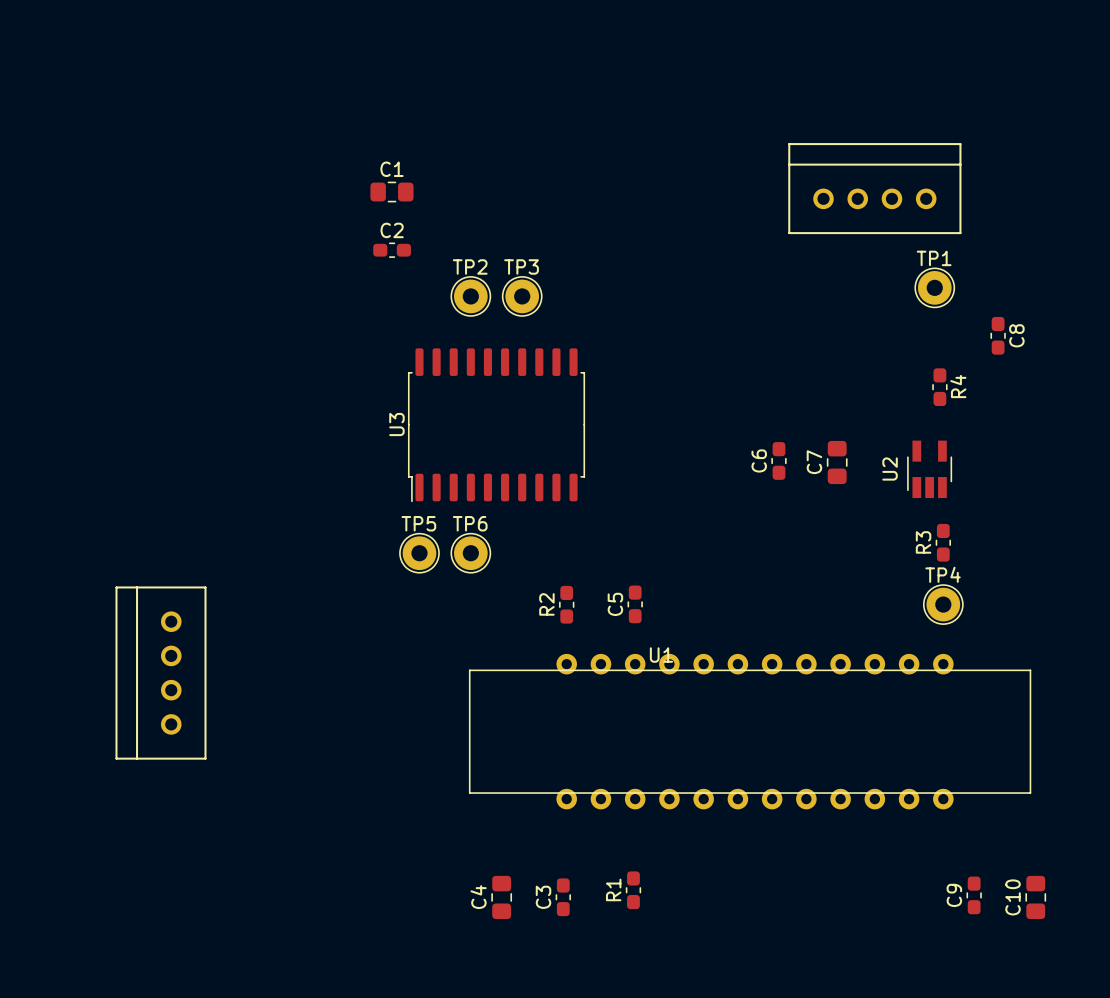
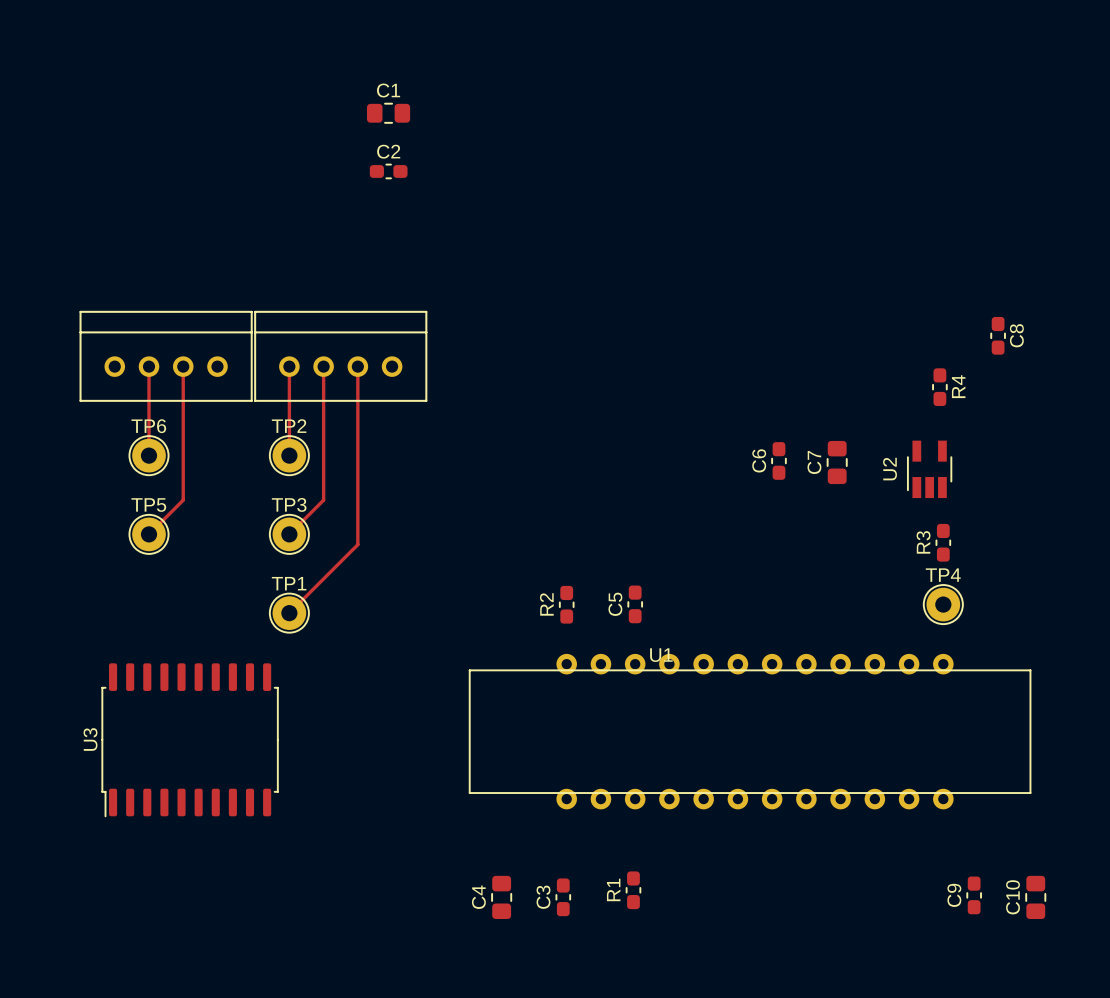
part: (874, 188) -> none
C1 position: (391, 192) -> (388, 113)
C2 position: (392, 250) -> (388, 171)
TP1 position: (934, 287) -> (289, 613)
TP2 position: (470, 296) -> (289, 455)
TP3 position: (522, 296) -> (289, 534)
part: none -> (166, 356)
part: none -> (340, 356)
top track: none -> (149, 366) (149, 455)
top track: none -> (183, 366) (183, 500) (149, 534)
top track: none -> (289, 366) (289, 455)
top track: none -> (323, 366) (323, 500) (289, 534)
top track: none -> (357, 366) (357, 544) (289, 613)
U3 position: (496, 425) -> (190, 740)
TP5 position: (419, 553) -> (149, 534)
TP6 position: (470, 553) -> (149, 455)
part: (160, 673) -> none

